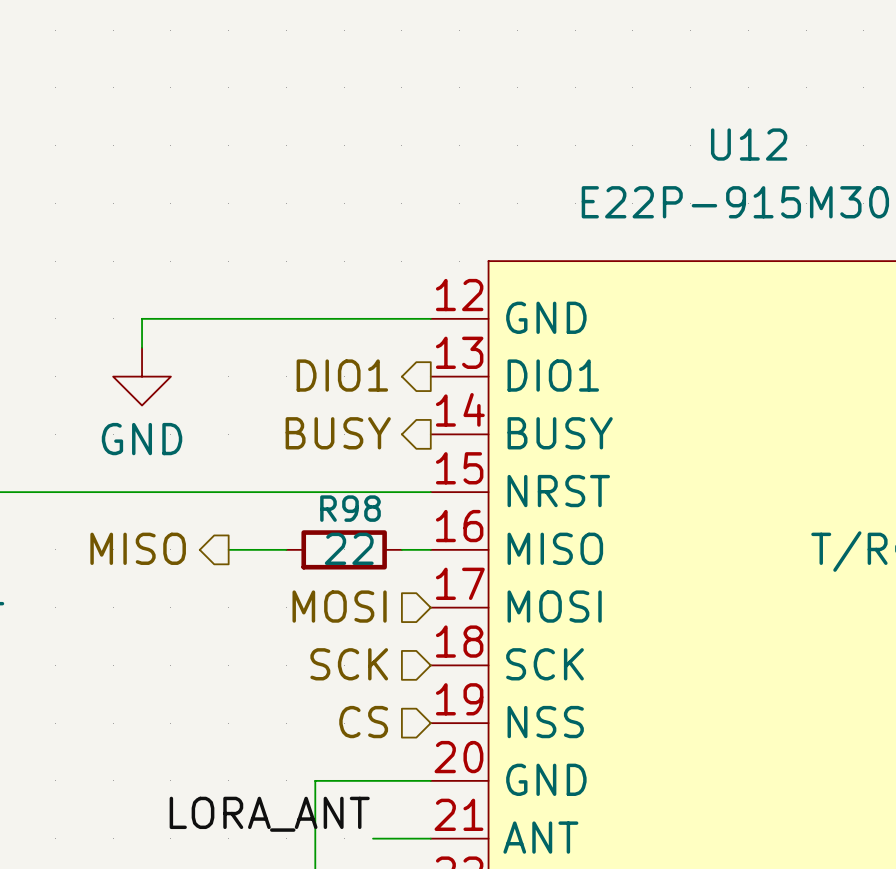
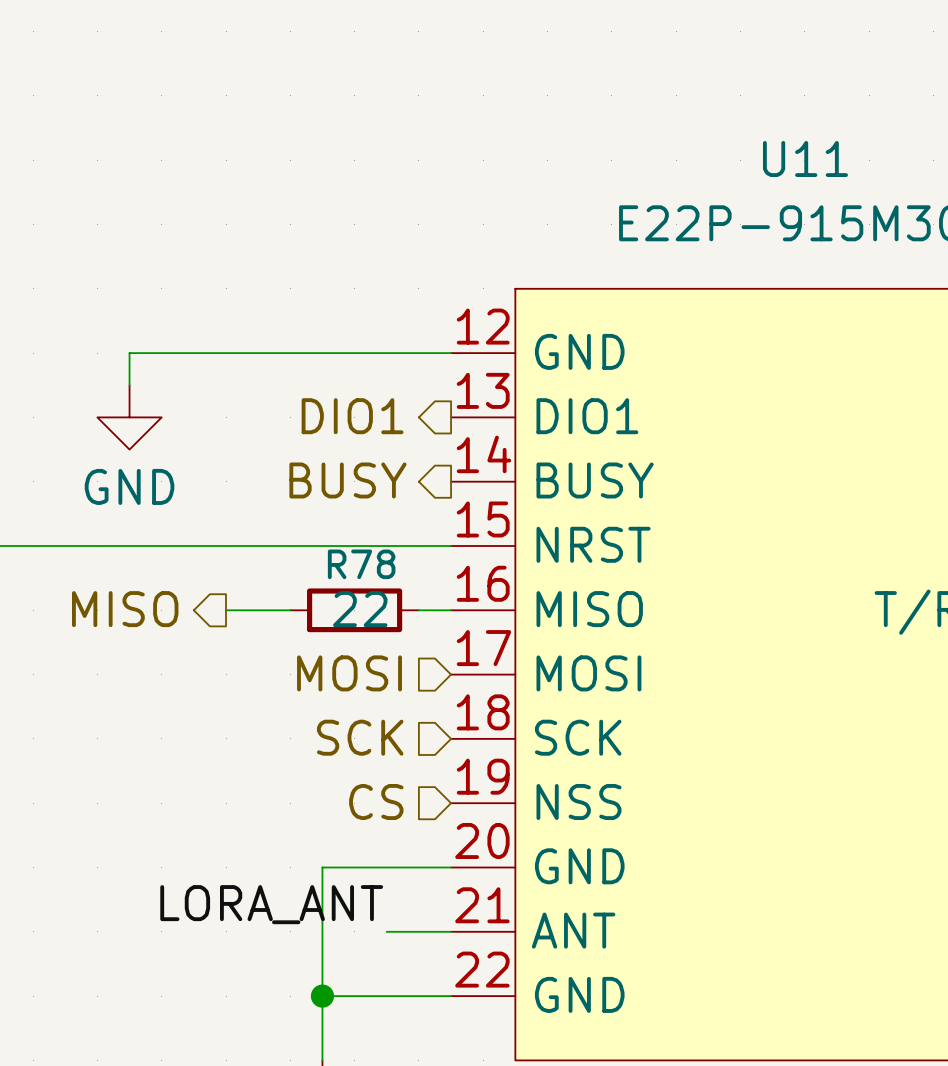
U12 name: U12 (749, 144) -> U11 (805, 158)
R98 name: R98 (350, 508) -> R78 (361, 564)

